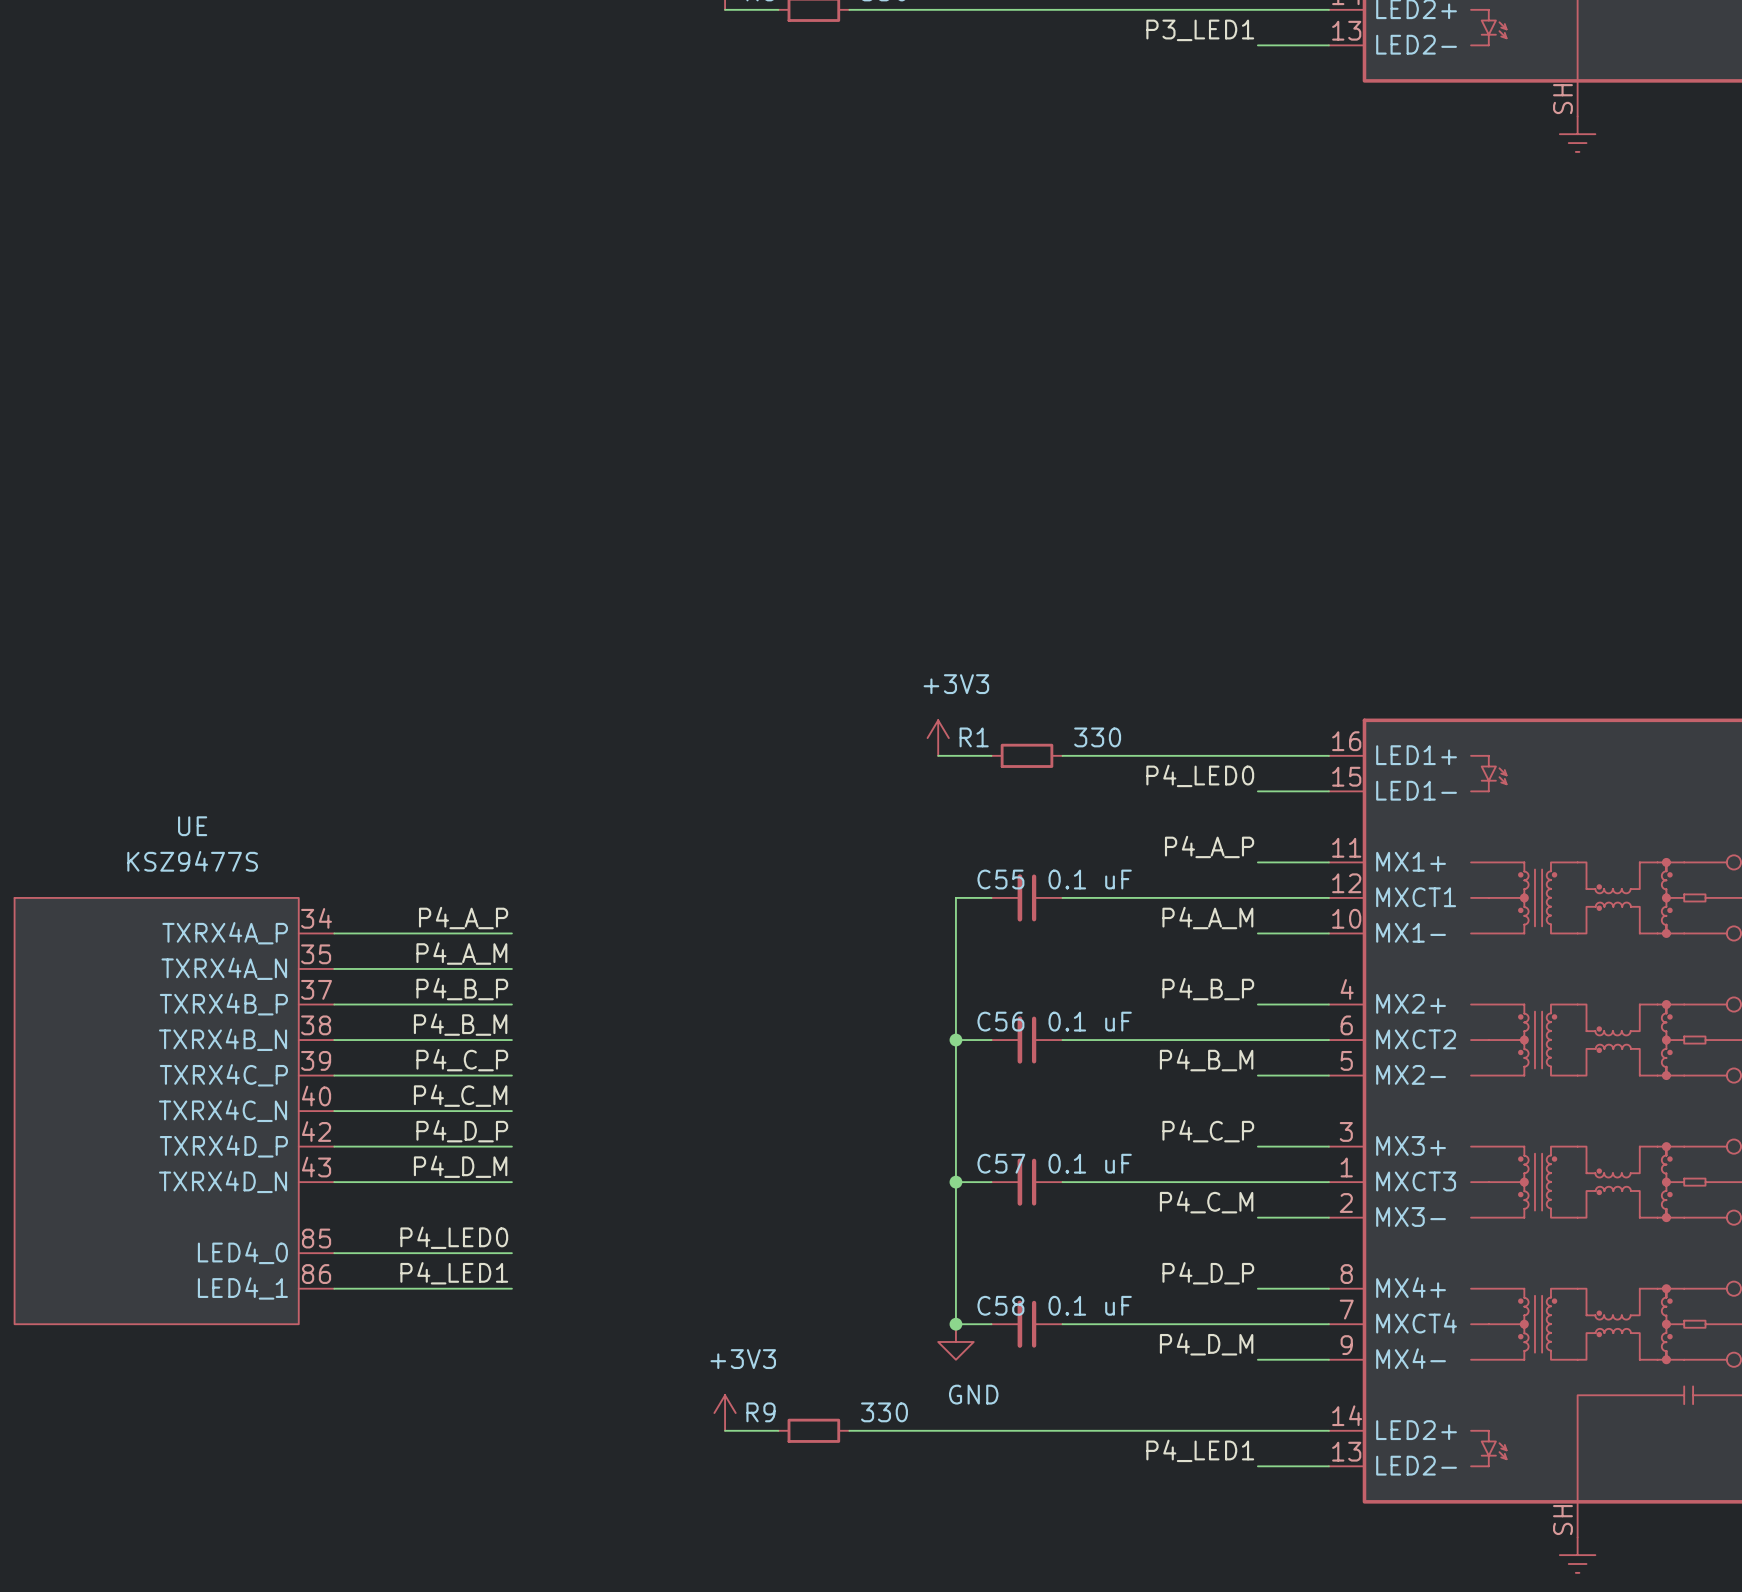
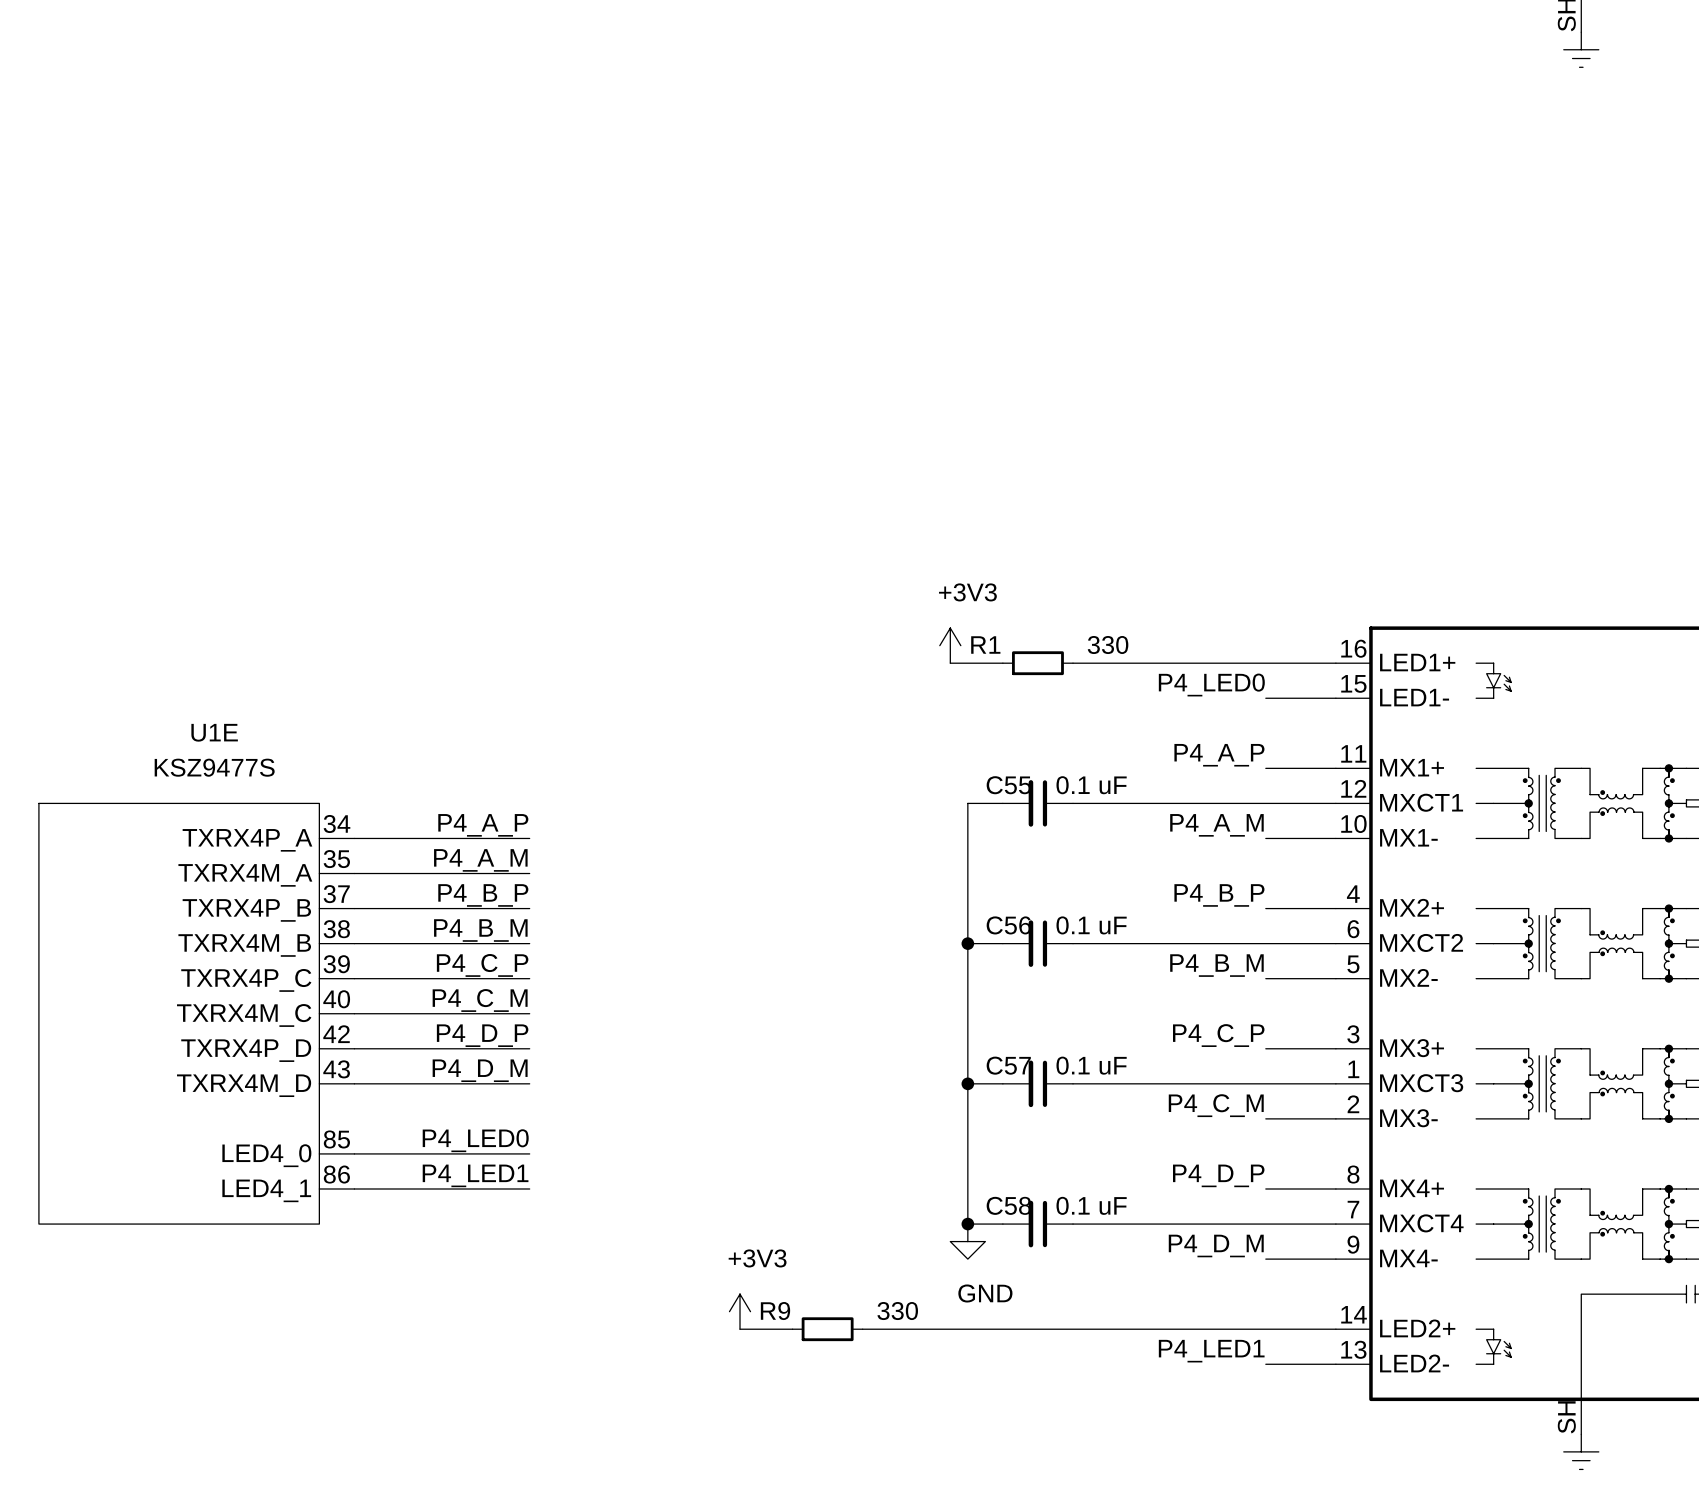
UE name: UE (192, 826) -> U1E (214, 732)
UE pin name: TXRX4A_P (225, 933) -> TXRX4P_A (247, 840)
UE pin name: TXRX4A_N (224, 968) -> TXRX4M_A (245, 875)
UE pin name: TXRX4B_P (223, 1004) -> TXRX4P_B (246, 910)
UE pin name: TXRX4B_N (223, 1039) -> TXRX4M_B (244, 945)
UE pin name: TXRX4C_P (223, 1075) -> TXRX4P_C (246, 980)
UE pin name: TXRX4C_N (223, 1110) -> TXRX4M_C (244, 1015)
UE pin name: TXRX4D_P (223, 1146) -> TXRX4P_D (246, 1050)
UE pin name: TXRX4D_N (223, 1181) -> TXRX4M_D (244, 1085)

